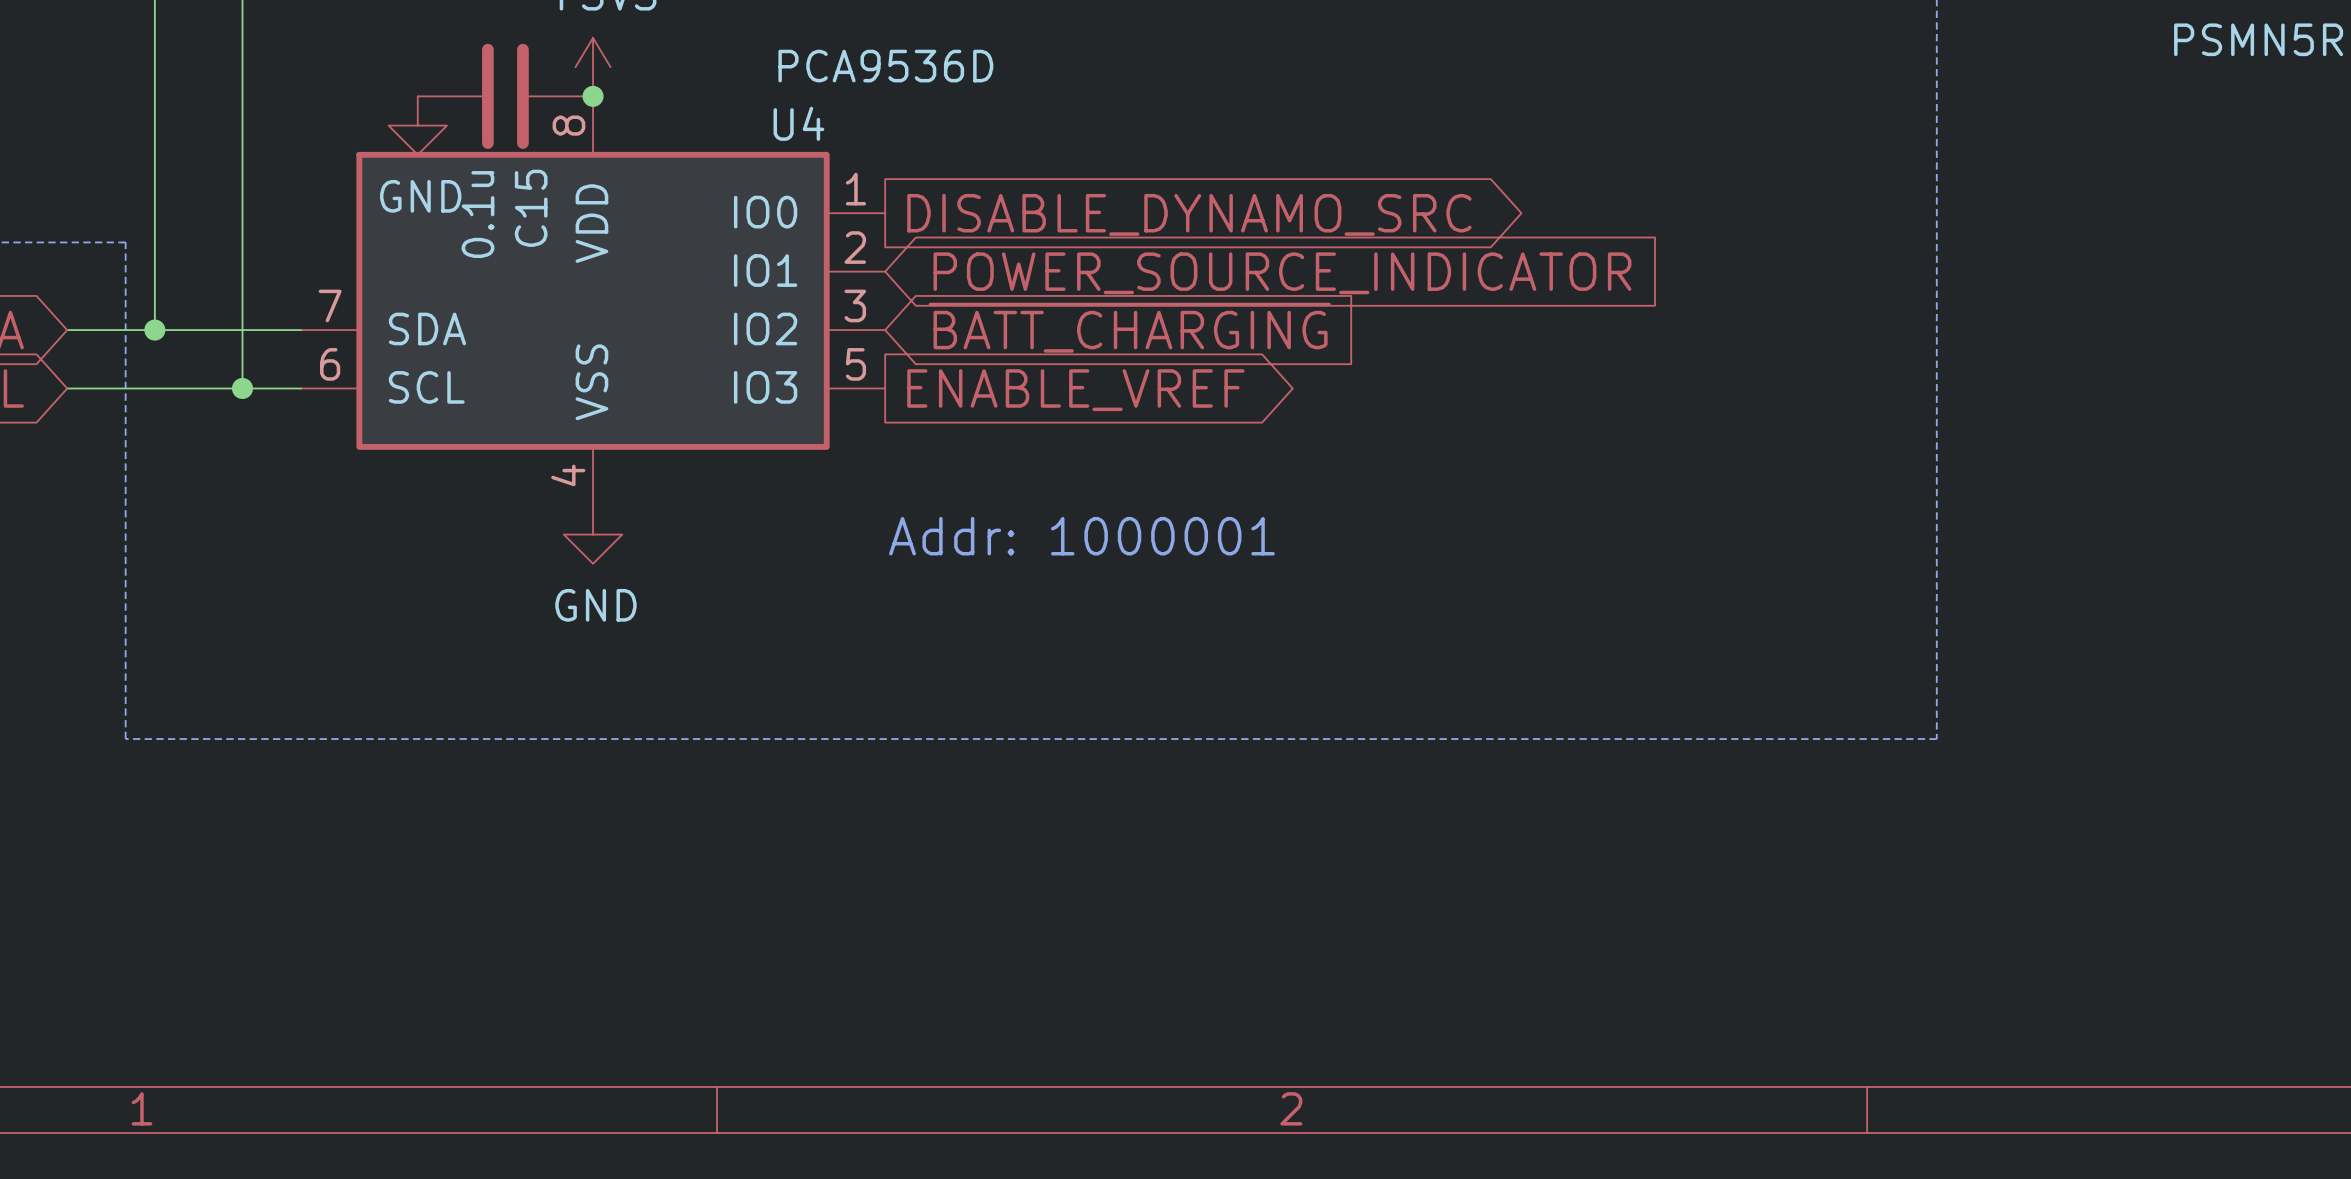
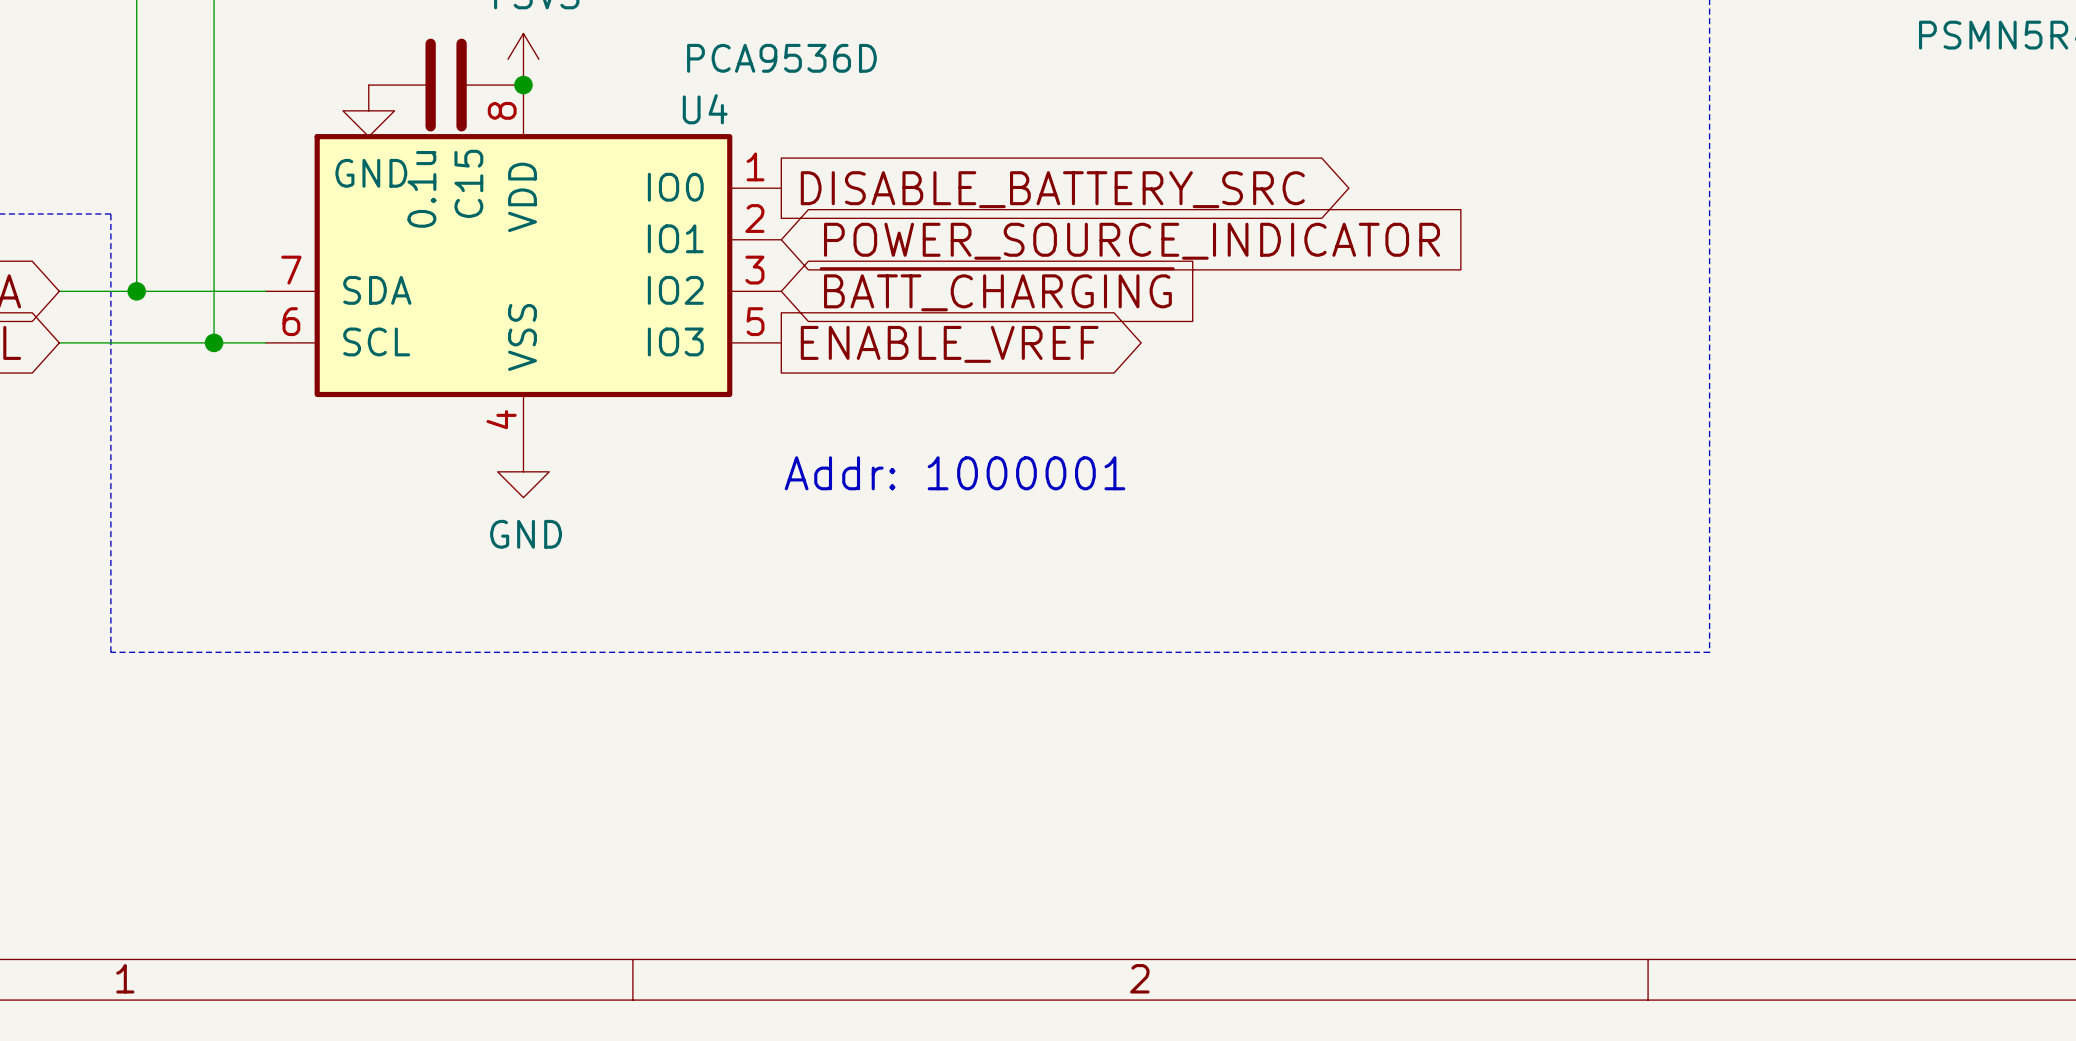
global label: DISABLE_DYNAMO_SRC (1189, 214) -> DISABLE_BATTERY_SRC (1052, 189)

